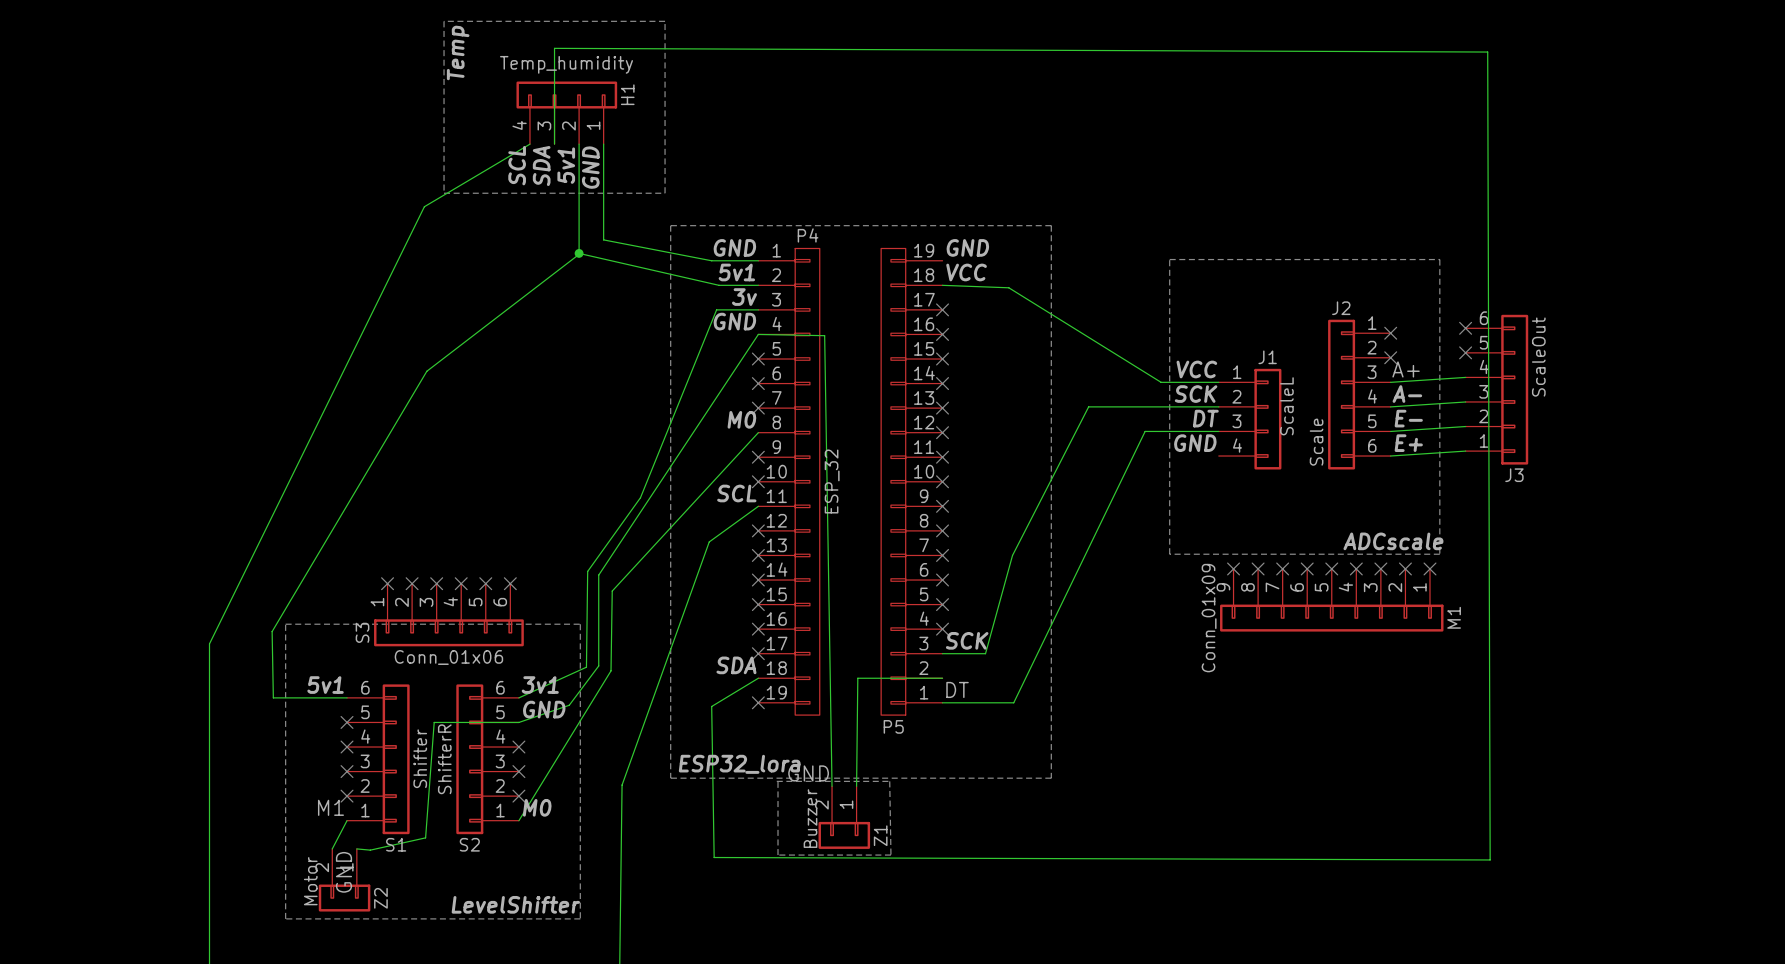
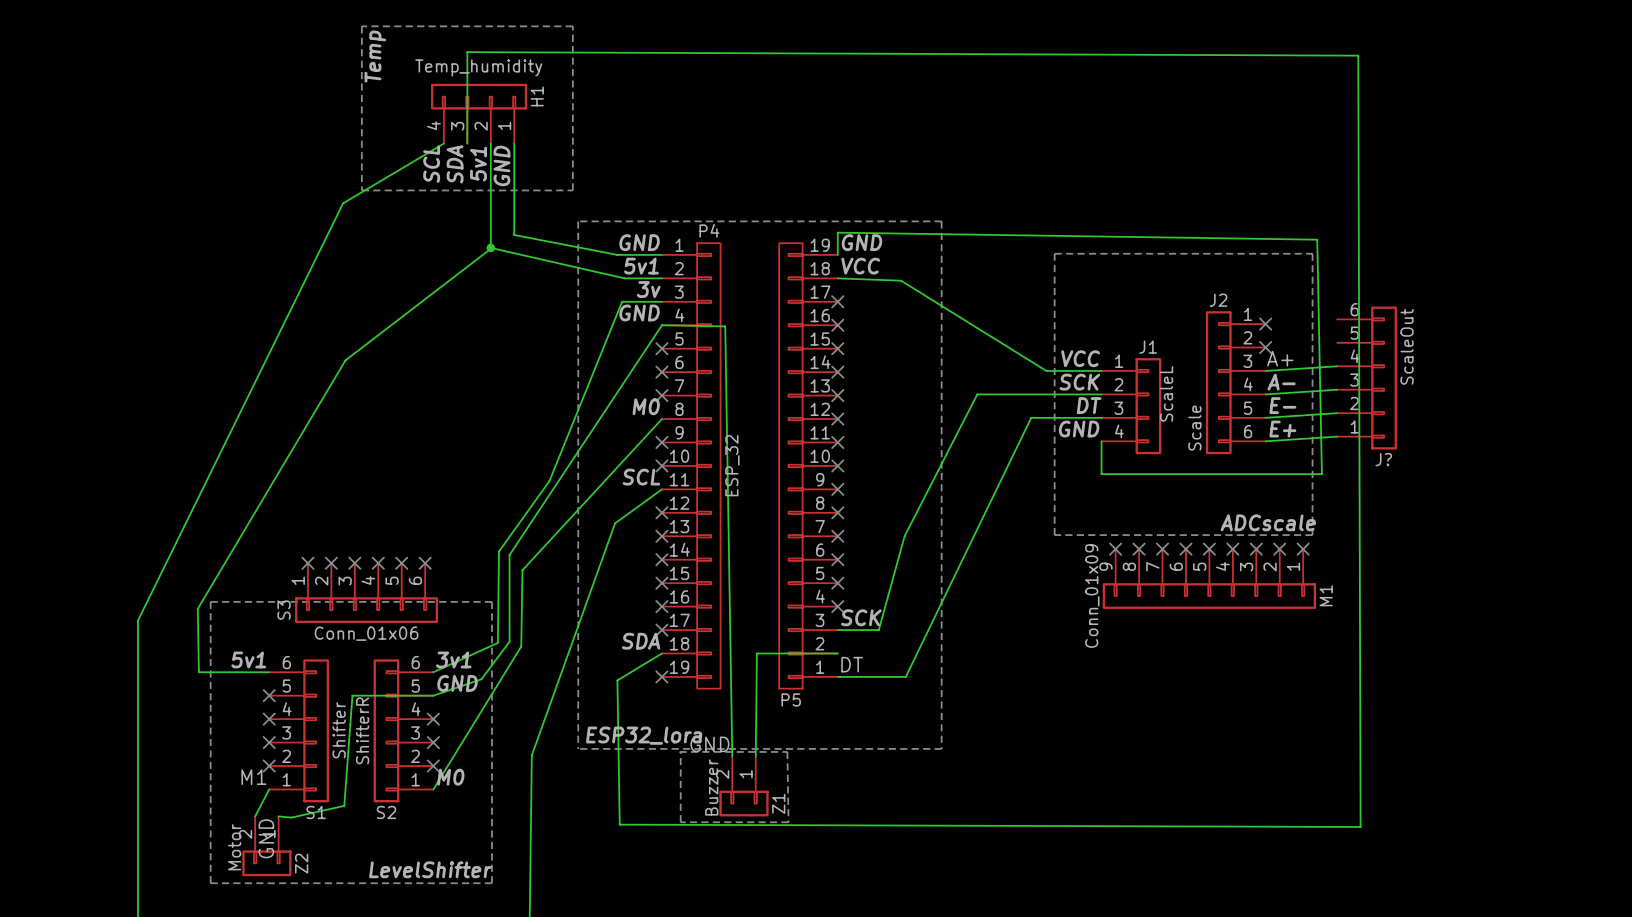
wire: none -> (837, 254) (837, 232) (1317, 239) (1321, 474) (1101, 474) (1101, 441)
no-connect mark: (1465, 328) -> none
no-connect mark: (1465, 352) -> none
J3 name: J3 (1514, 475) -> J? (1383, 459)

